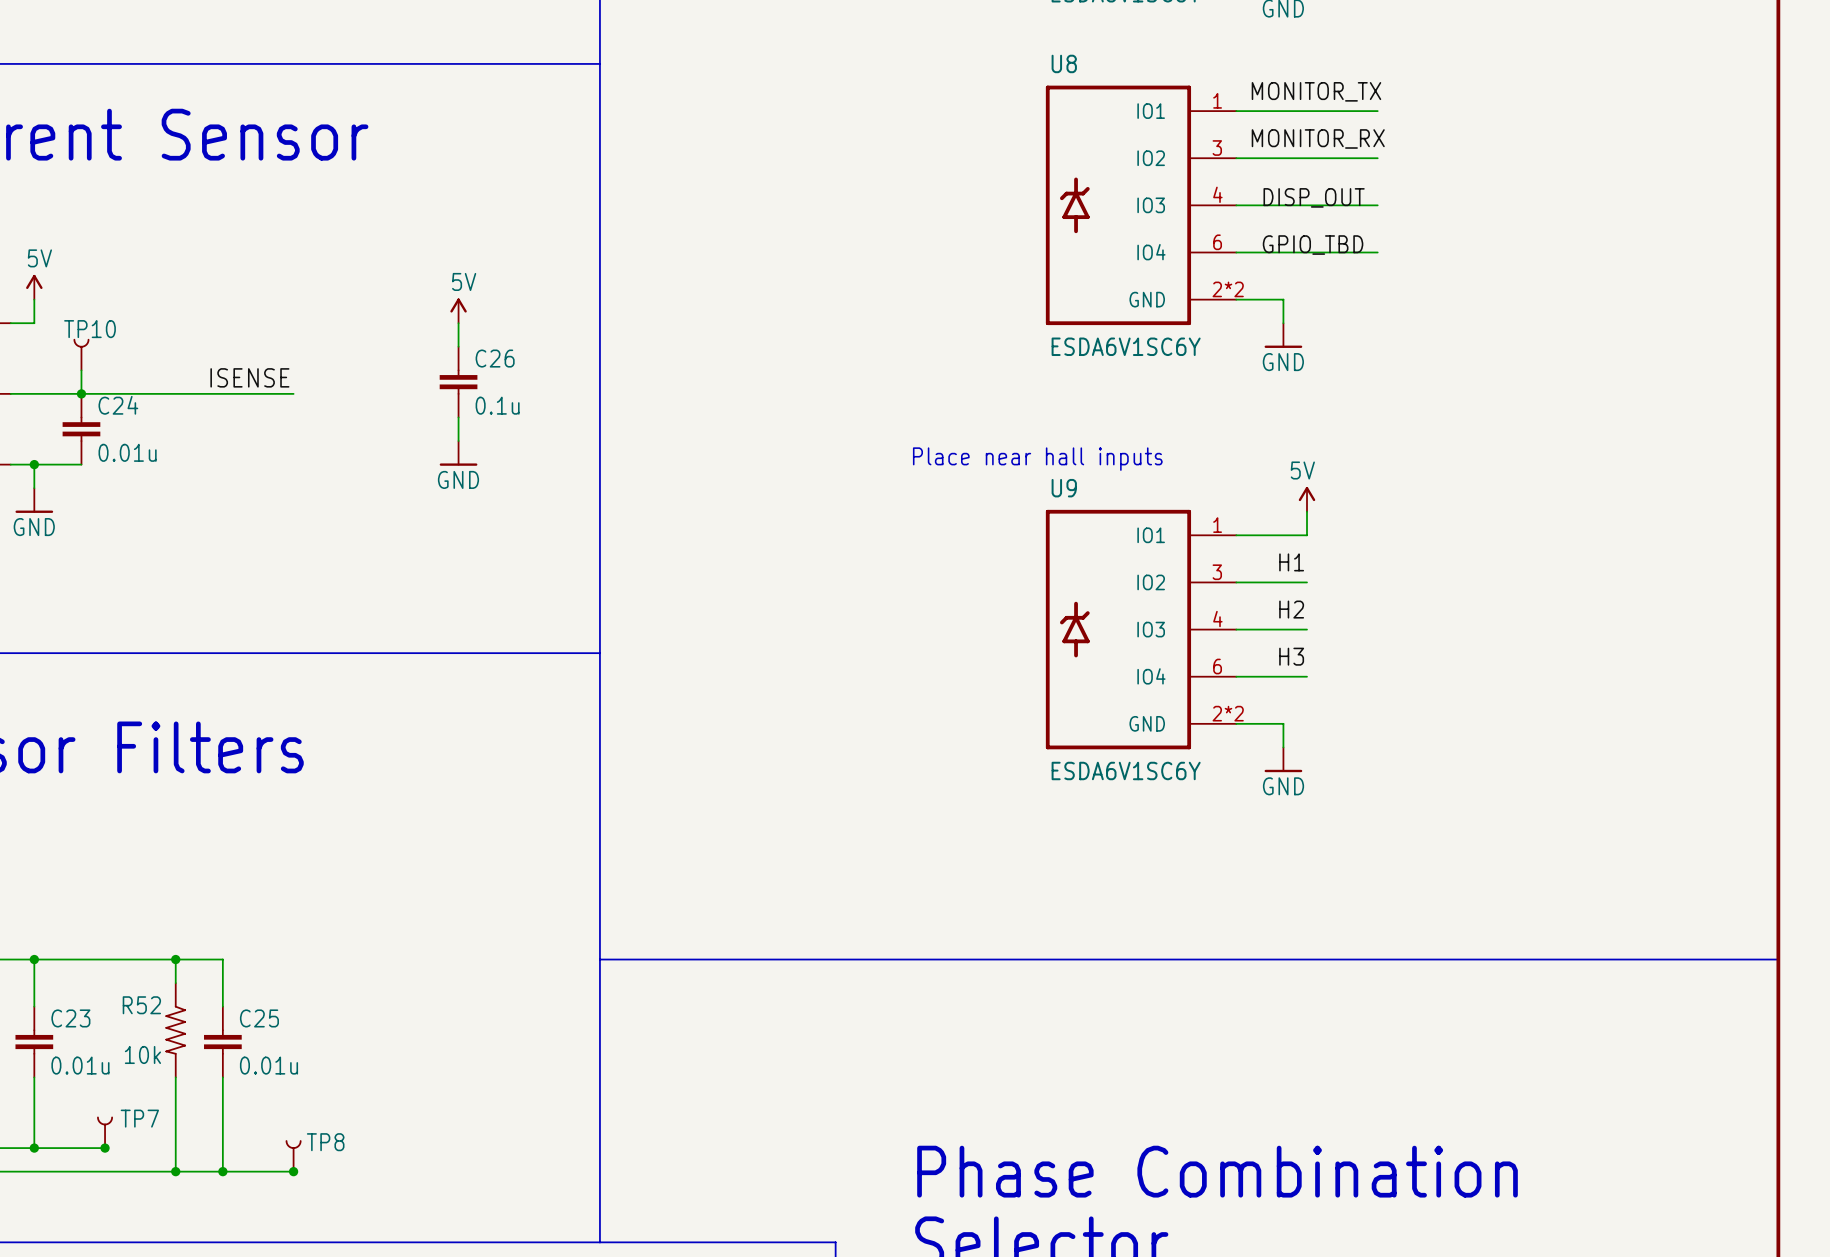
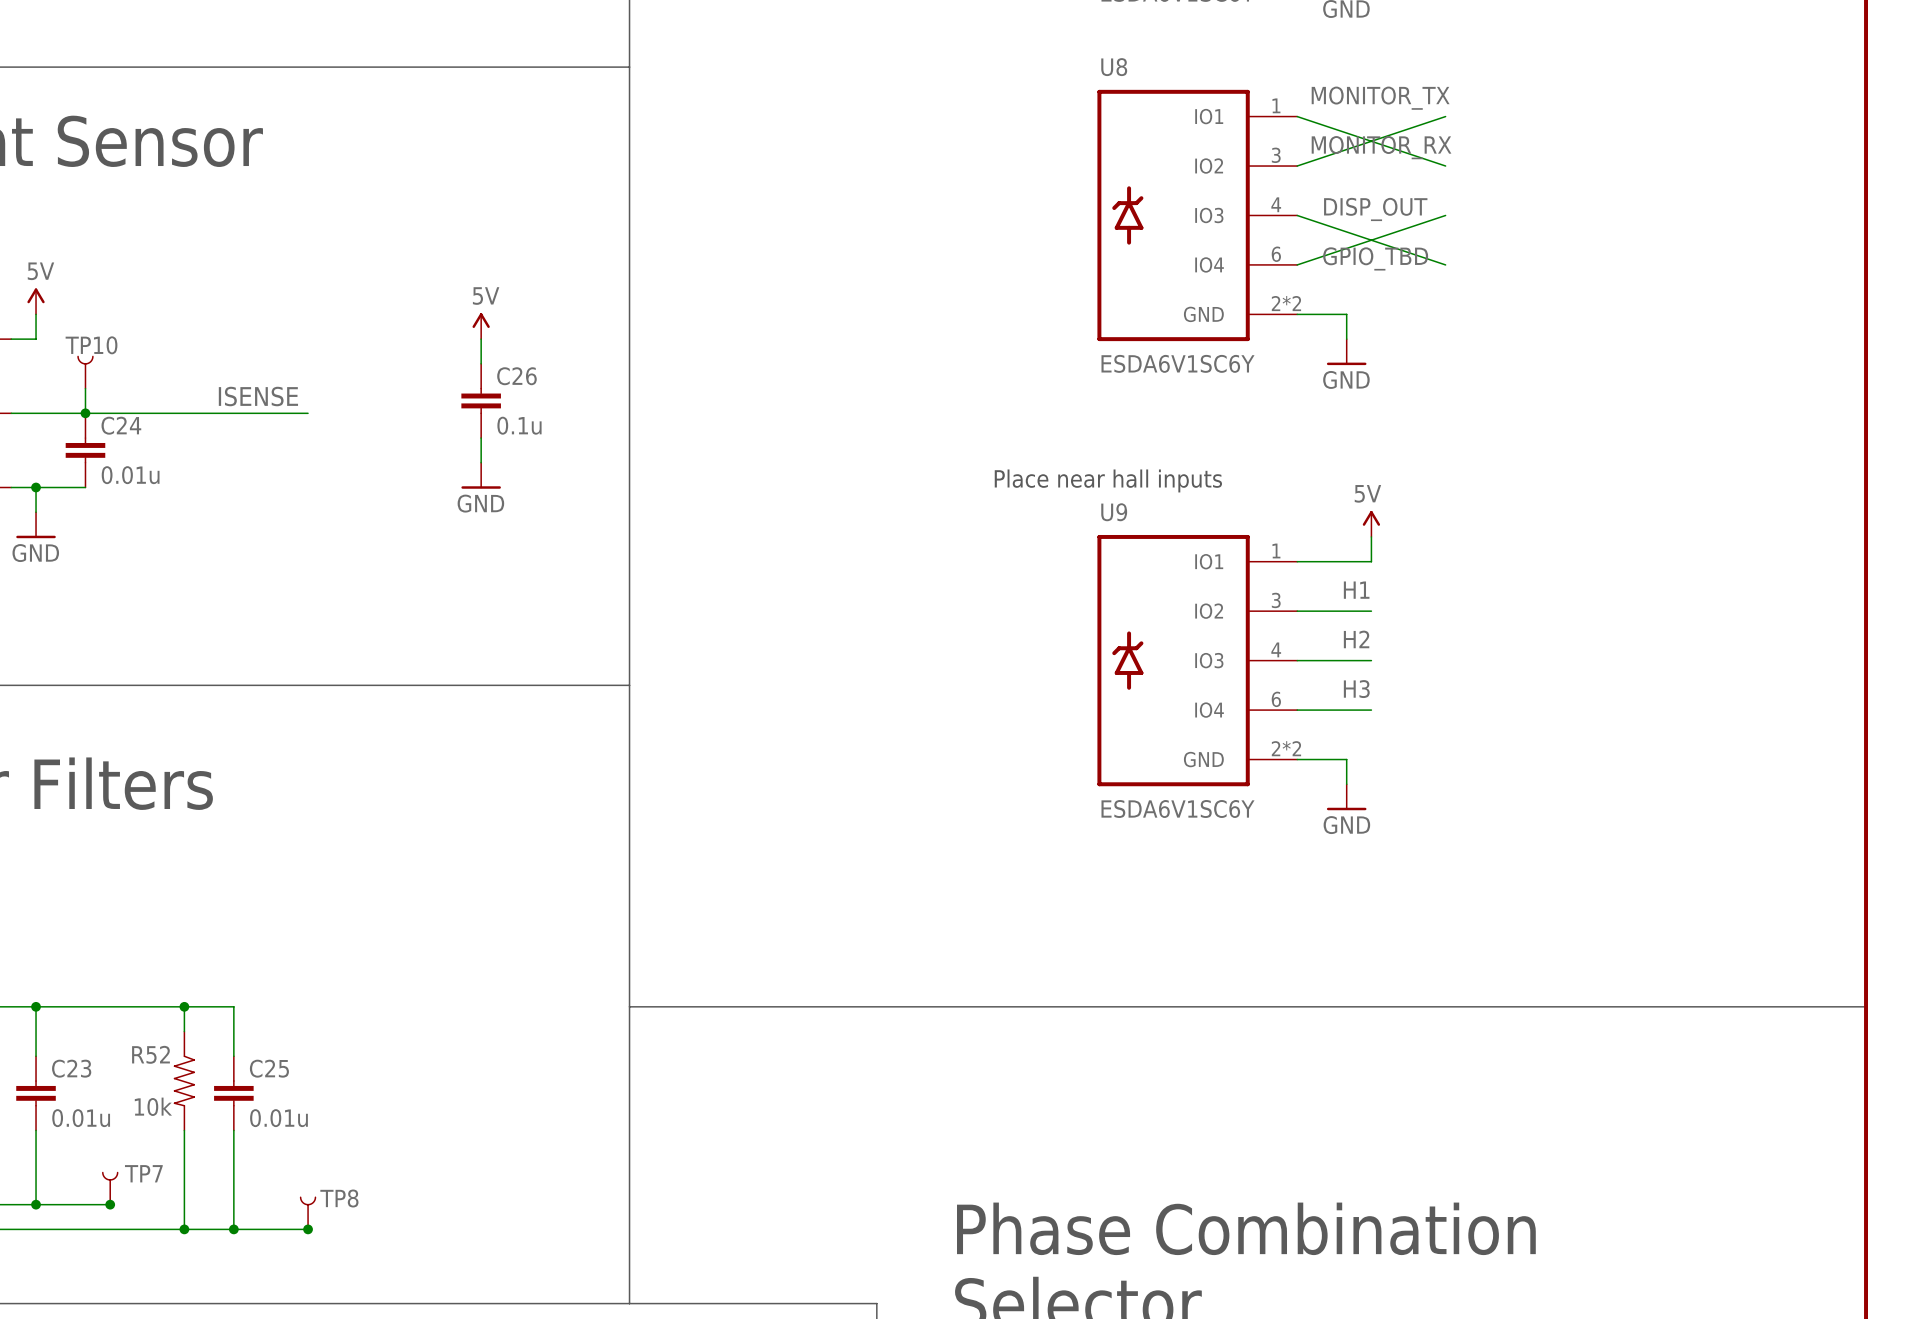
wire: (1236, 111) (1377, 111) -> (1297, 116) (1445, 166)
wire: (1236, 158) (1377, 158) -> (1297, 166) (1445, 116)
wire: (1236, 205) (1377, 205) -> (1297, 215) (1445, 264)
wire: (1236, 252) (1377, 252) -> (1297, 264) (1445, 215)

